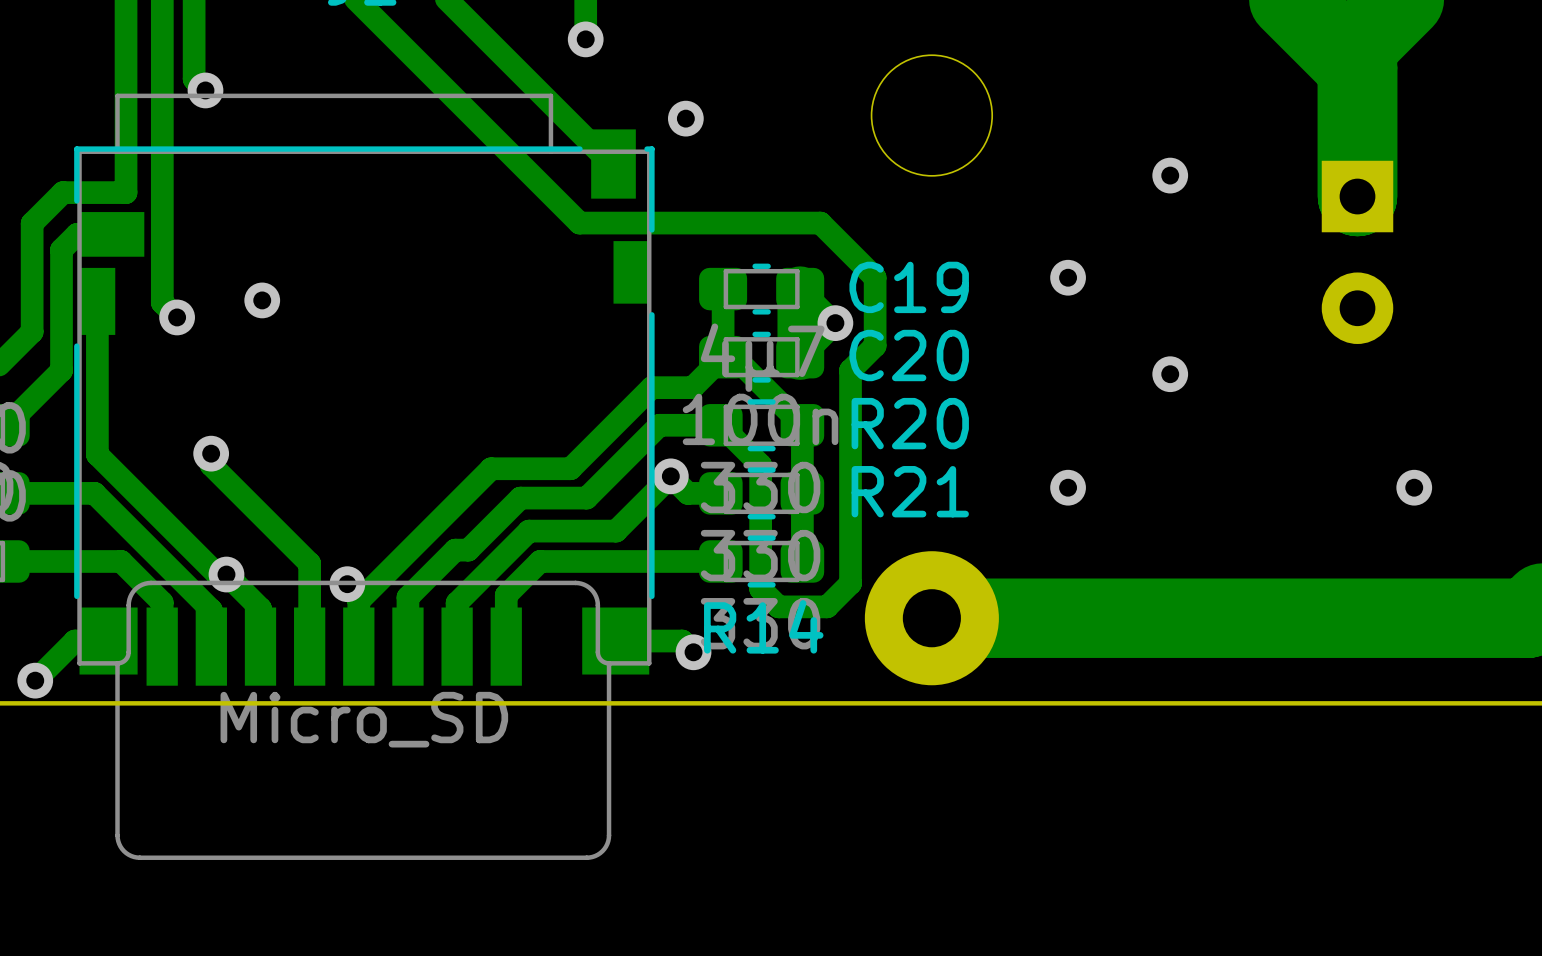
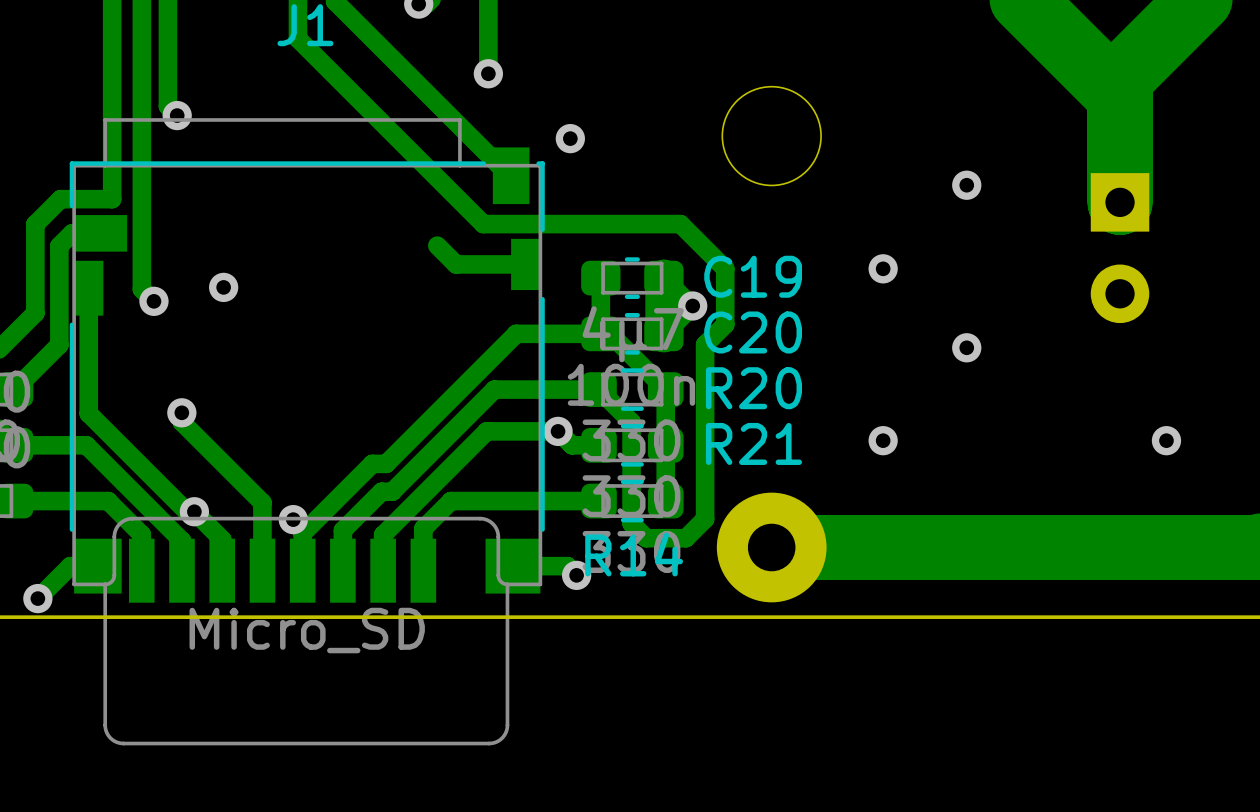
track: none -> (437, 245) (456, 264) (525, 264)
track: (723, 357) (692, 387) (651, 387) (570, 468) (491, 468) (443, 516) -> (600, 333) (516, 333) (386, 463) (372, 463)
track: (659, 425) (586, 498) (520, 498) -> (548, 389) (494, 389) (434, 449)
track: (670, 476) (616, 531) (528, 531) -> (558, 431) (486, 431) (441, 476)

